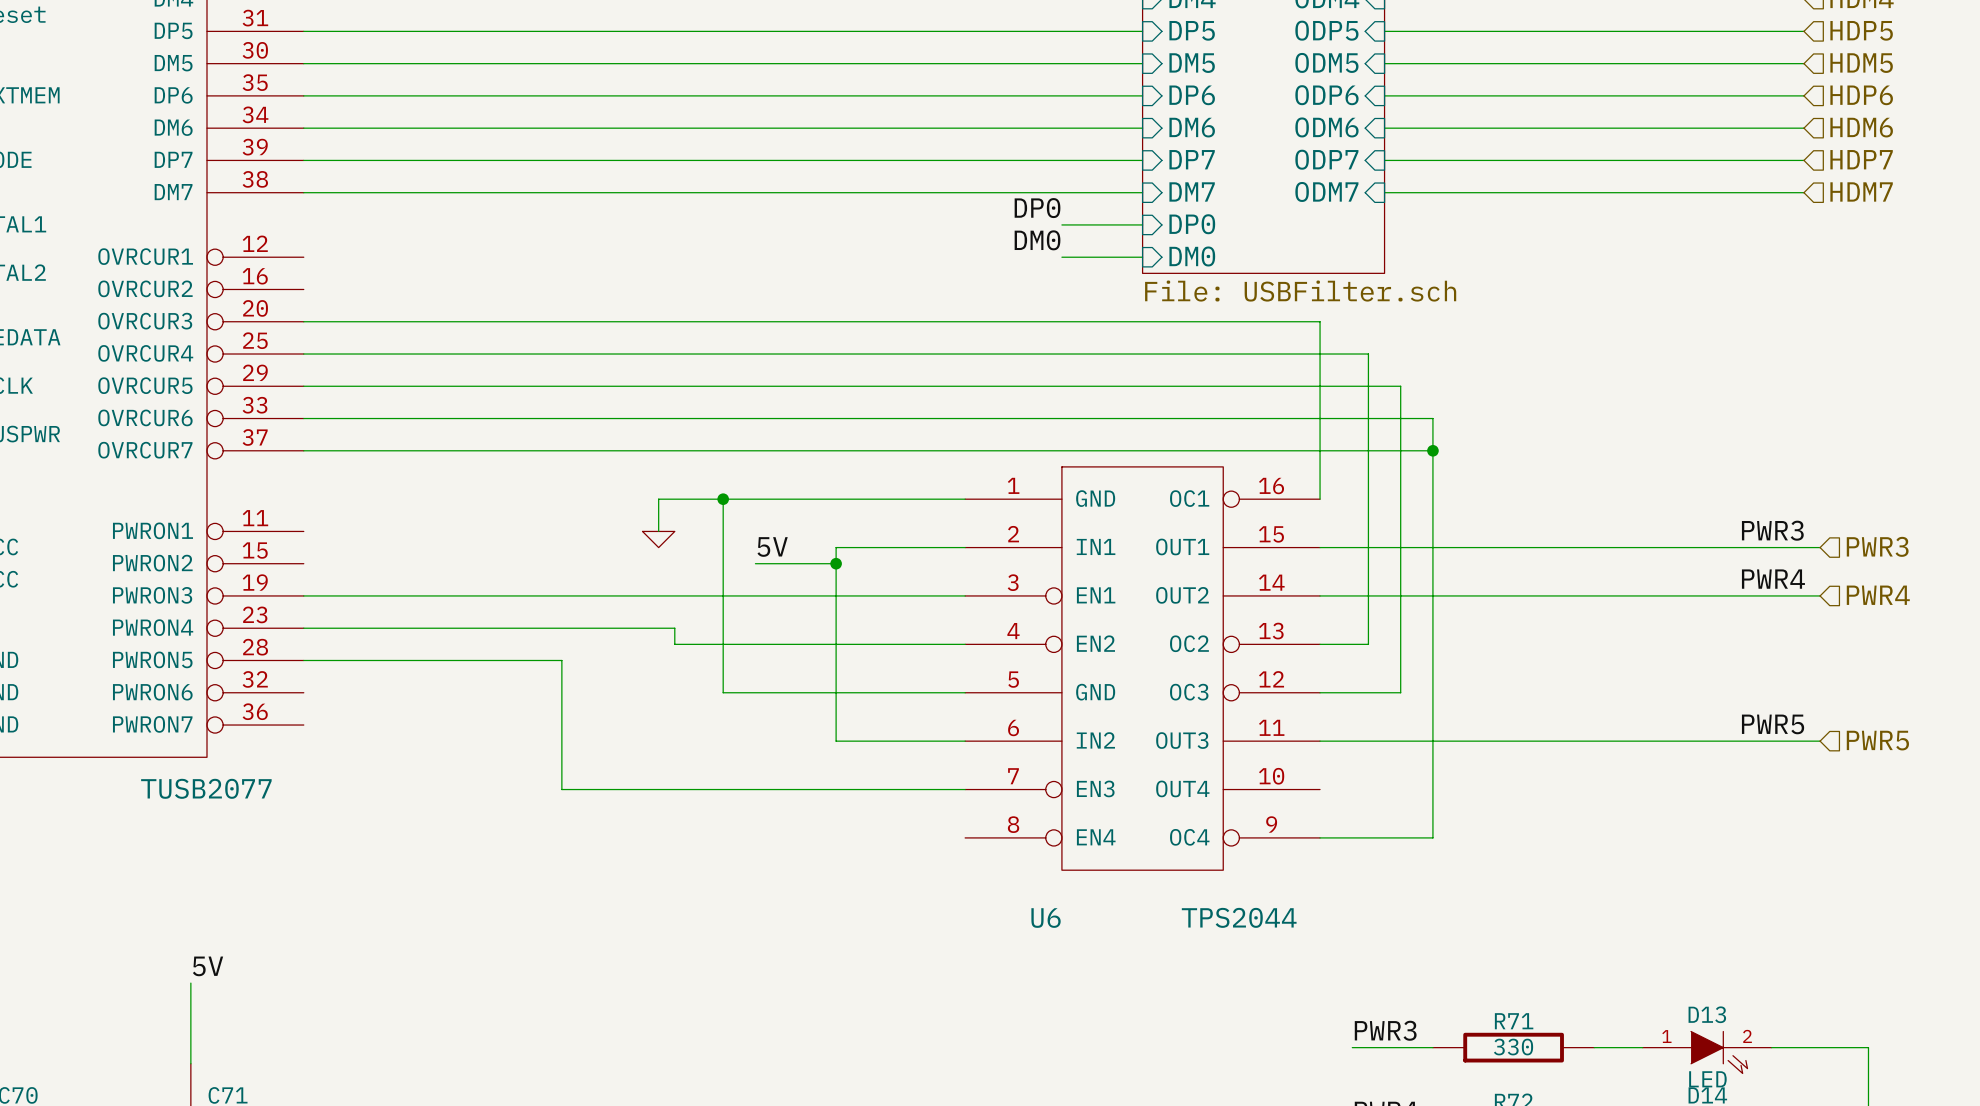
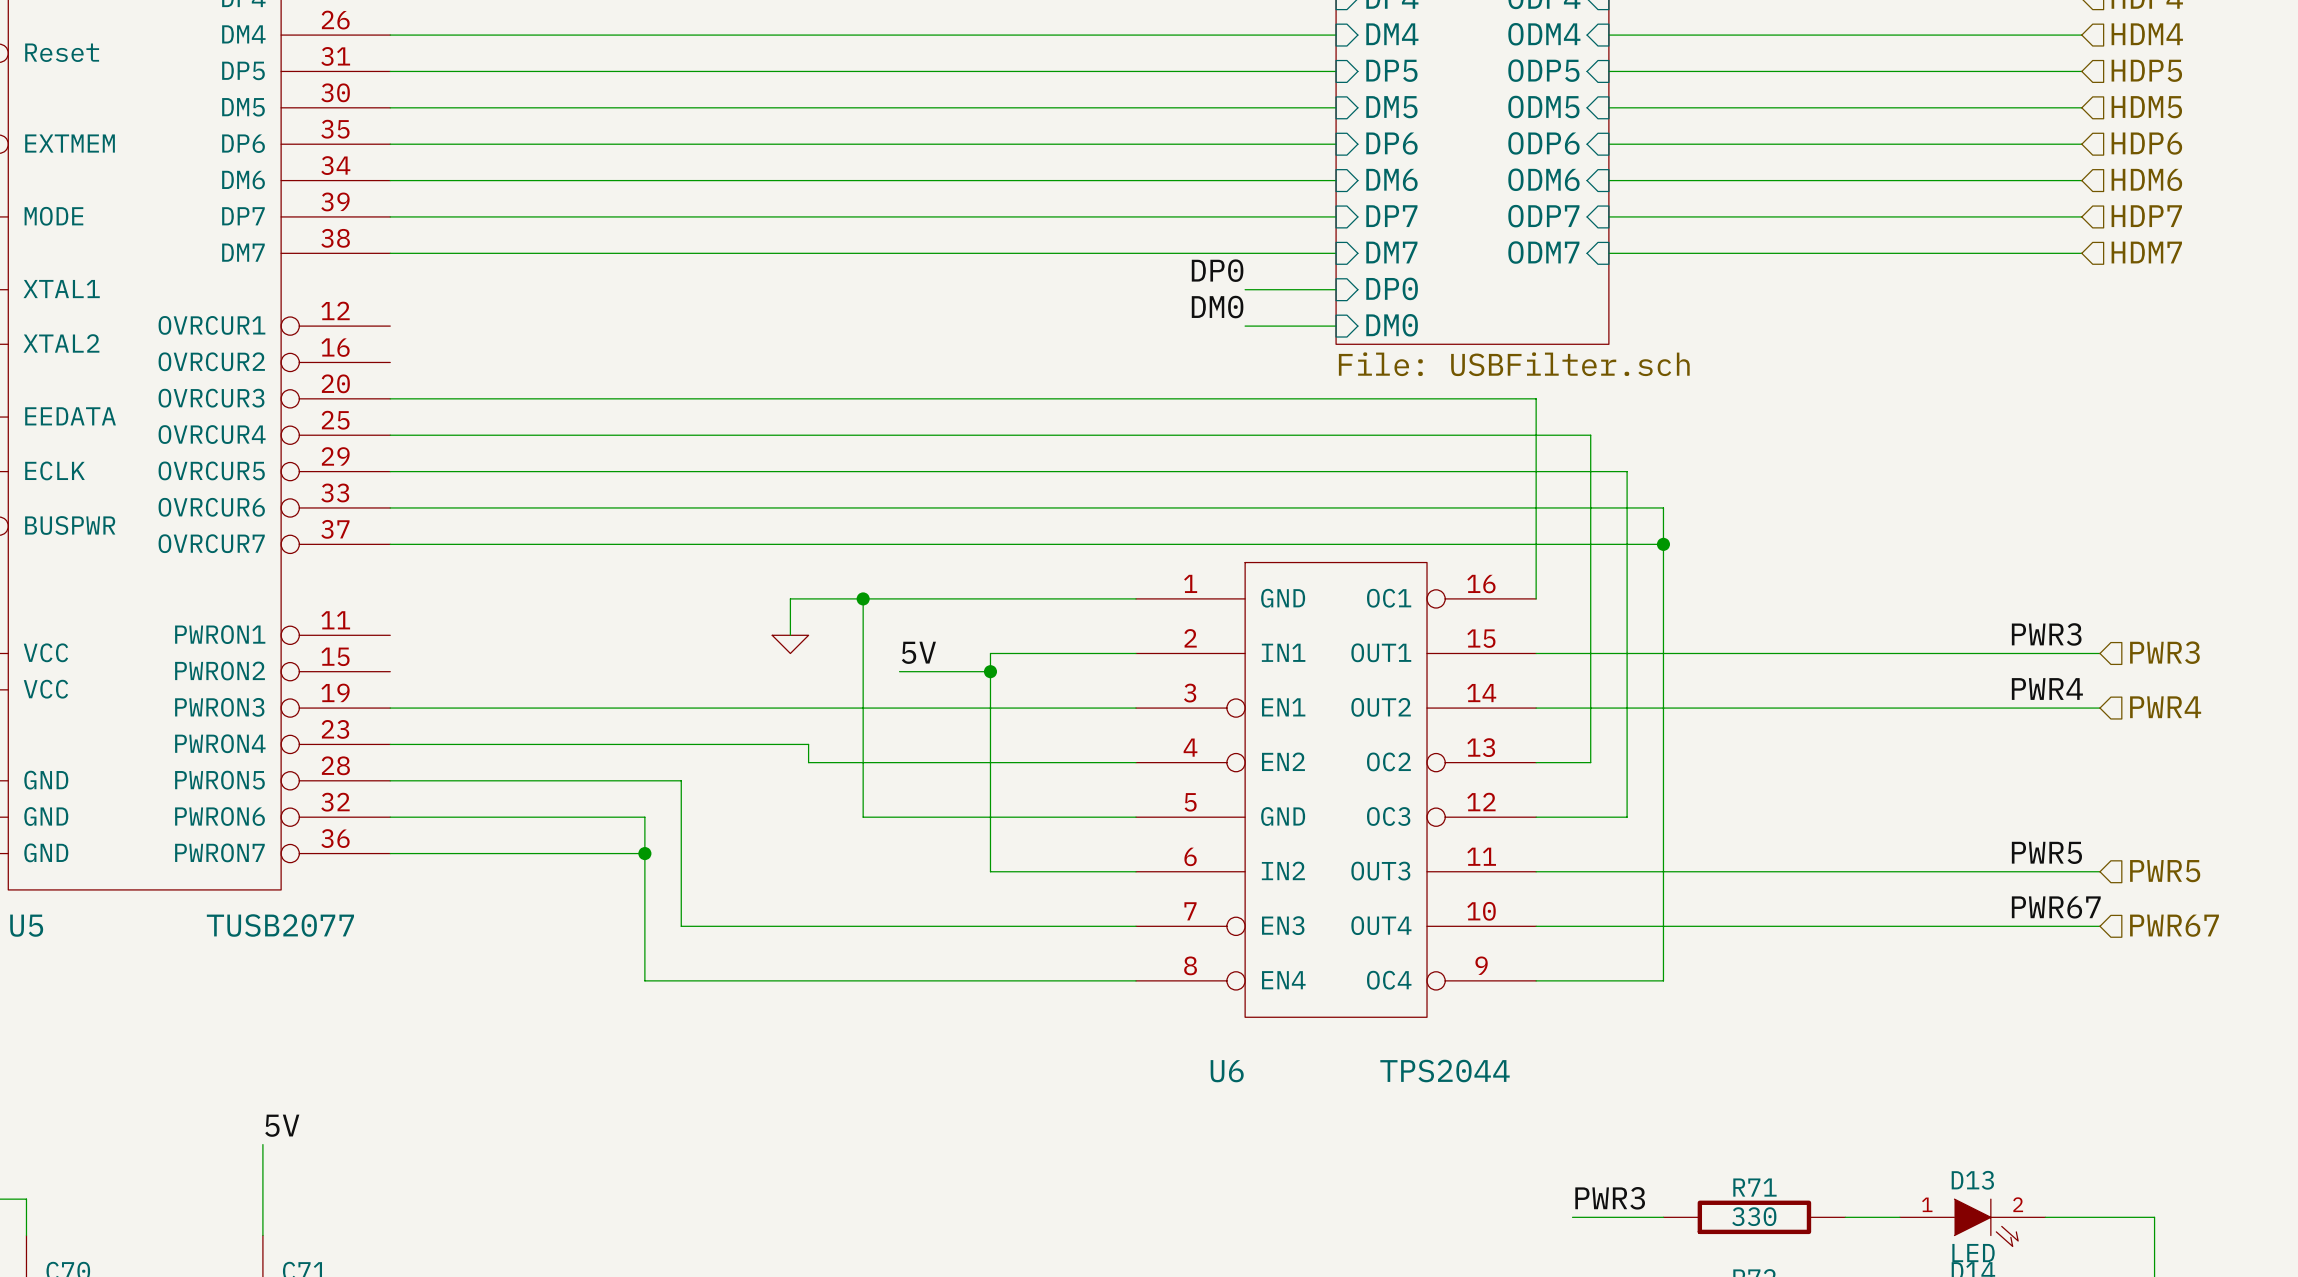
wire: none -> (390, 817) (644, 817) (644, 980) (1135, 980)
wire: none -> (390, 853) (644, 853)
junction: none -> (644, 853)
label: none -> PWR67 (2056, 907)
hierarchical label: none -> PWR67 (2174, 925)
wire: none -> (1536, 926) (2099, 926)

